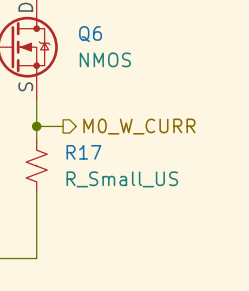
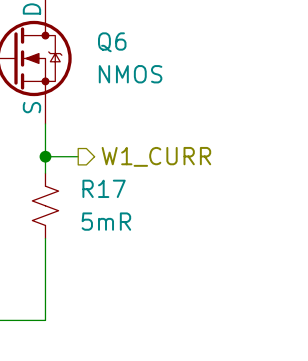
hierarchical label: M0_W_CURR (139, 126) -> W1_CURR (156, 156)
R17 value: R_Small_US (122, 179) -> 5mR (106, 221)

